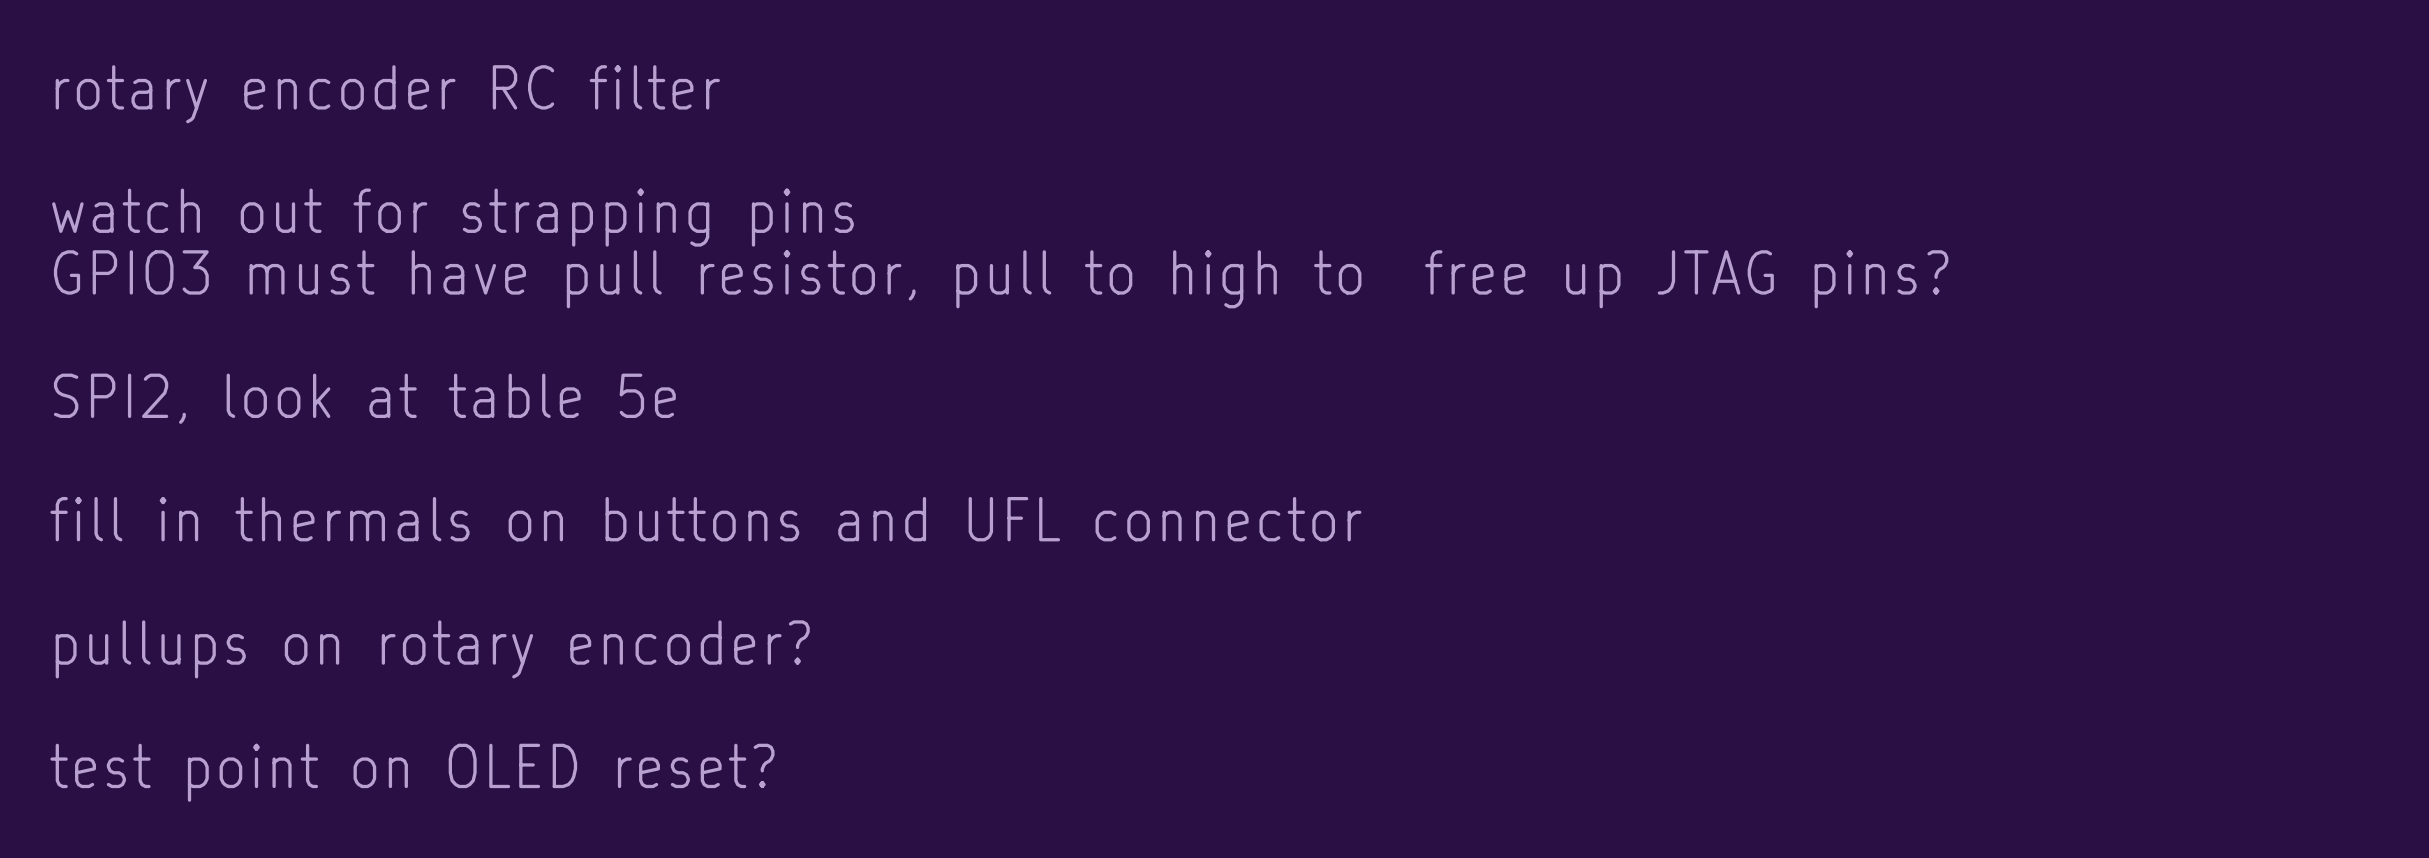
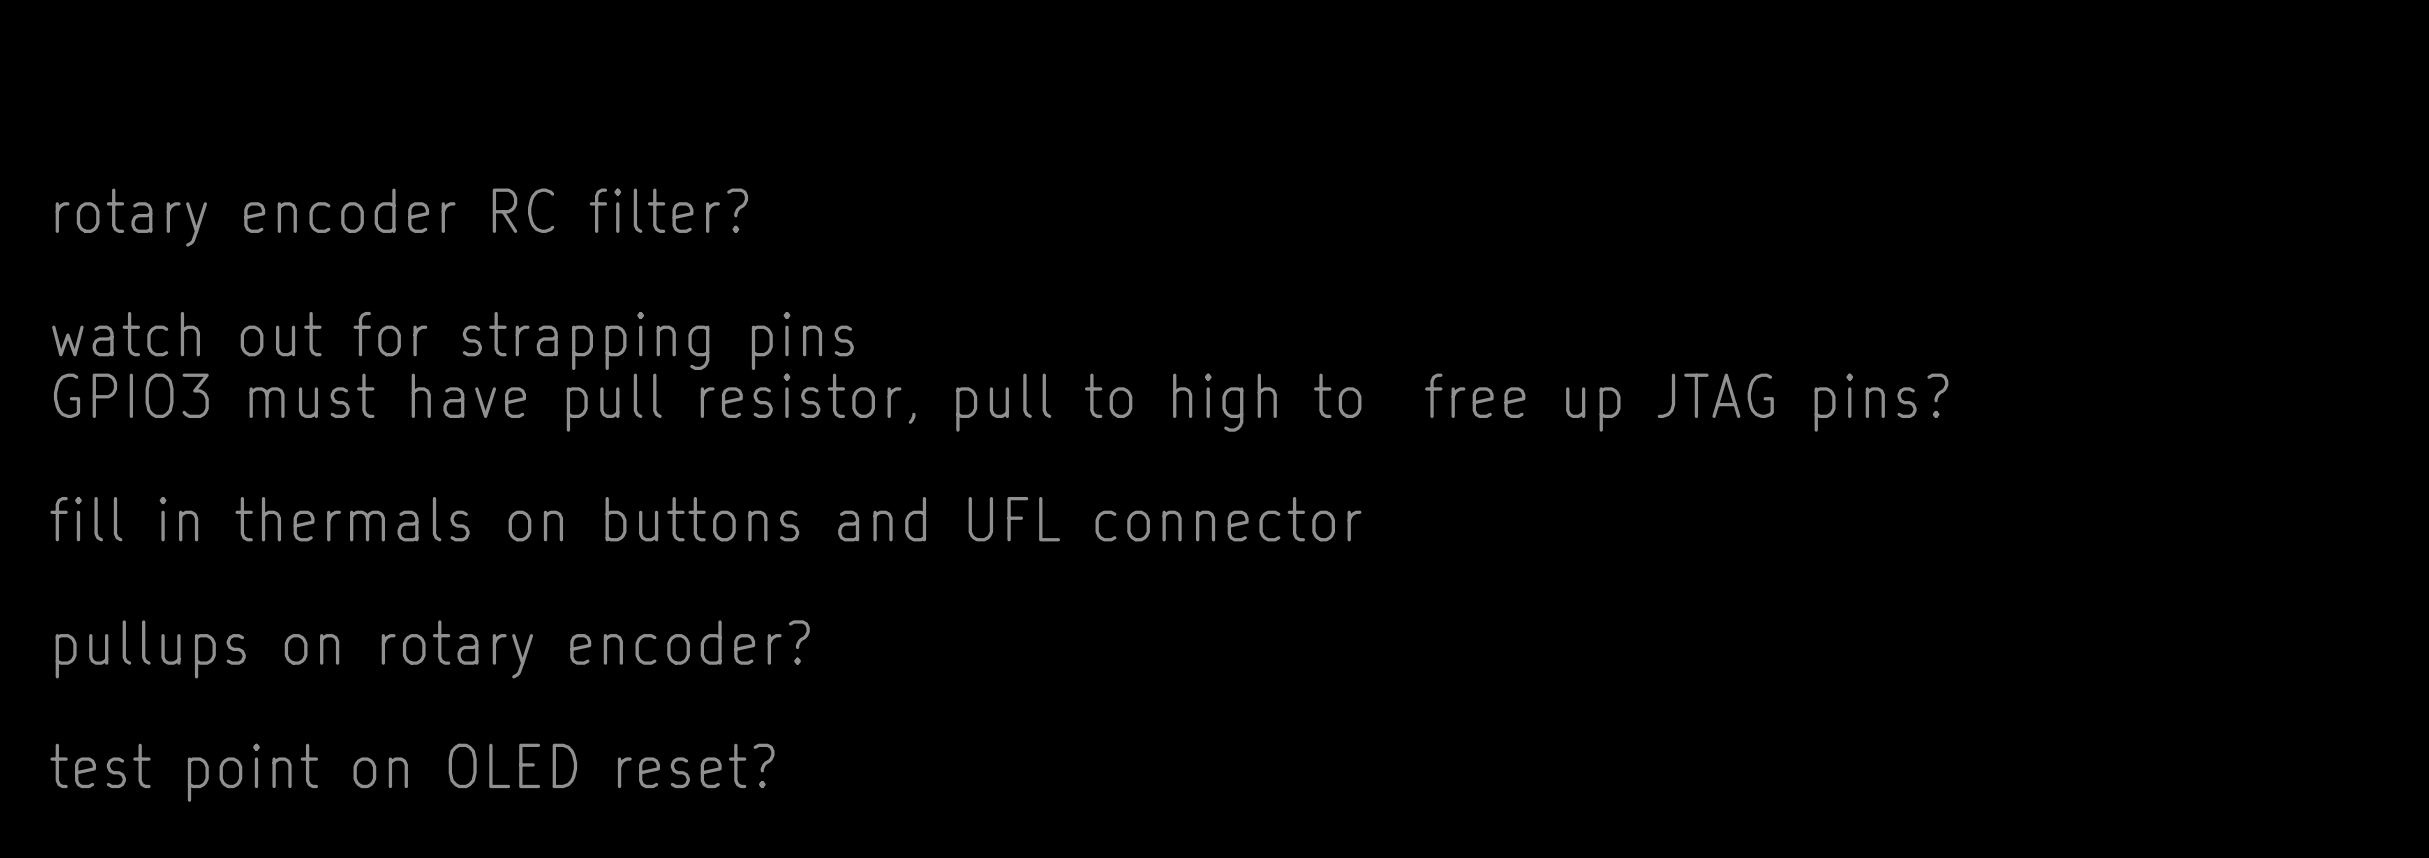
text: rotary encoder RC filter (387, 94) -> none
text: watch out for strapping pins (452, 217) -> rotary encoder RC filter? (401, 217)
text: GPIO3 must have pull resistor, pull to high to free up JTAG pins? (1001, 279) -> none
text: none -> watch out for strapping pins (452, 340)
text: SPI2, look at table 5e (364, 398) -> GPIO3 must have pull resistor, pull to high to free up JTAG pins? (1001, 402)

